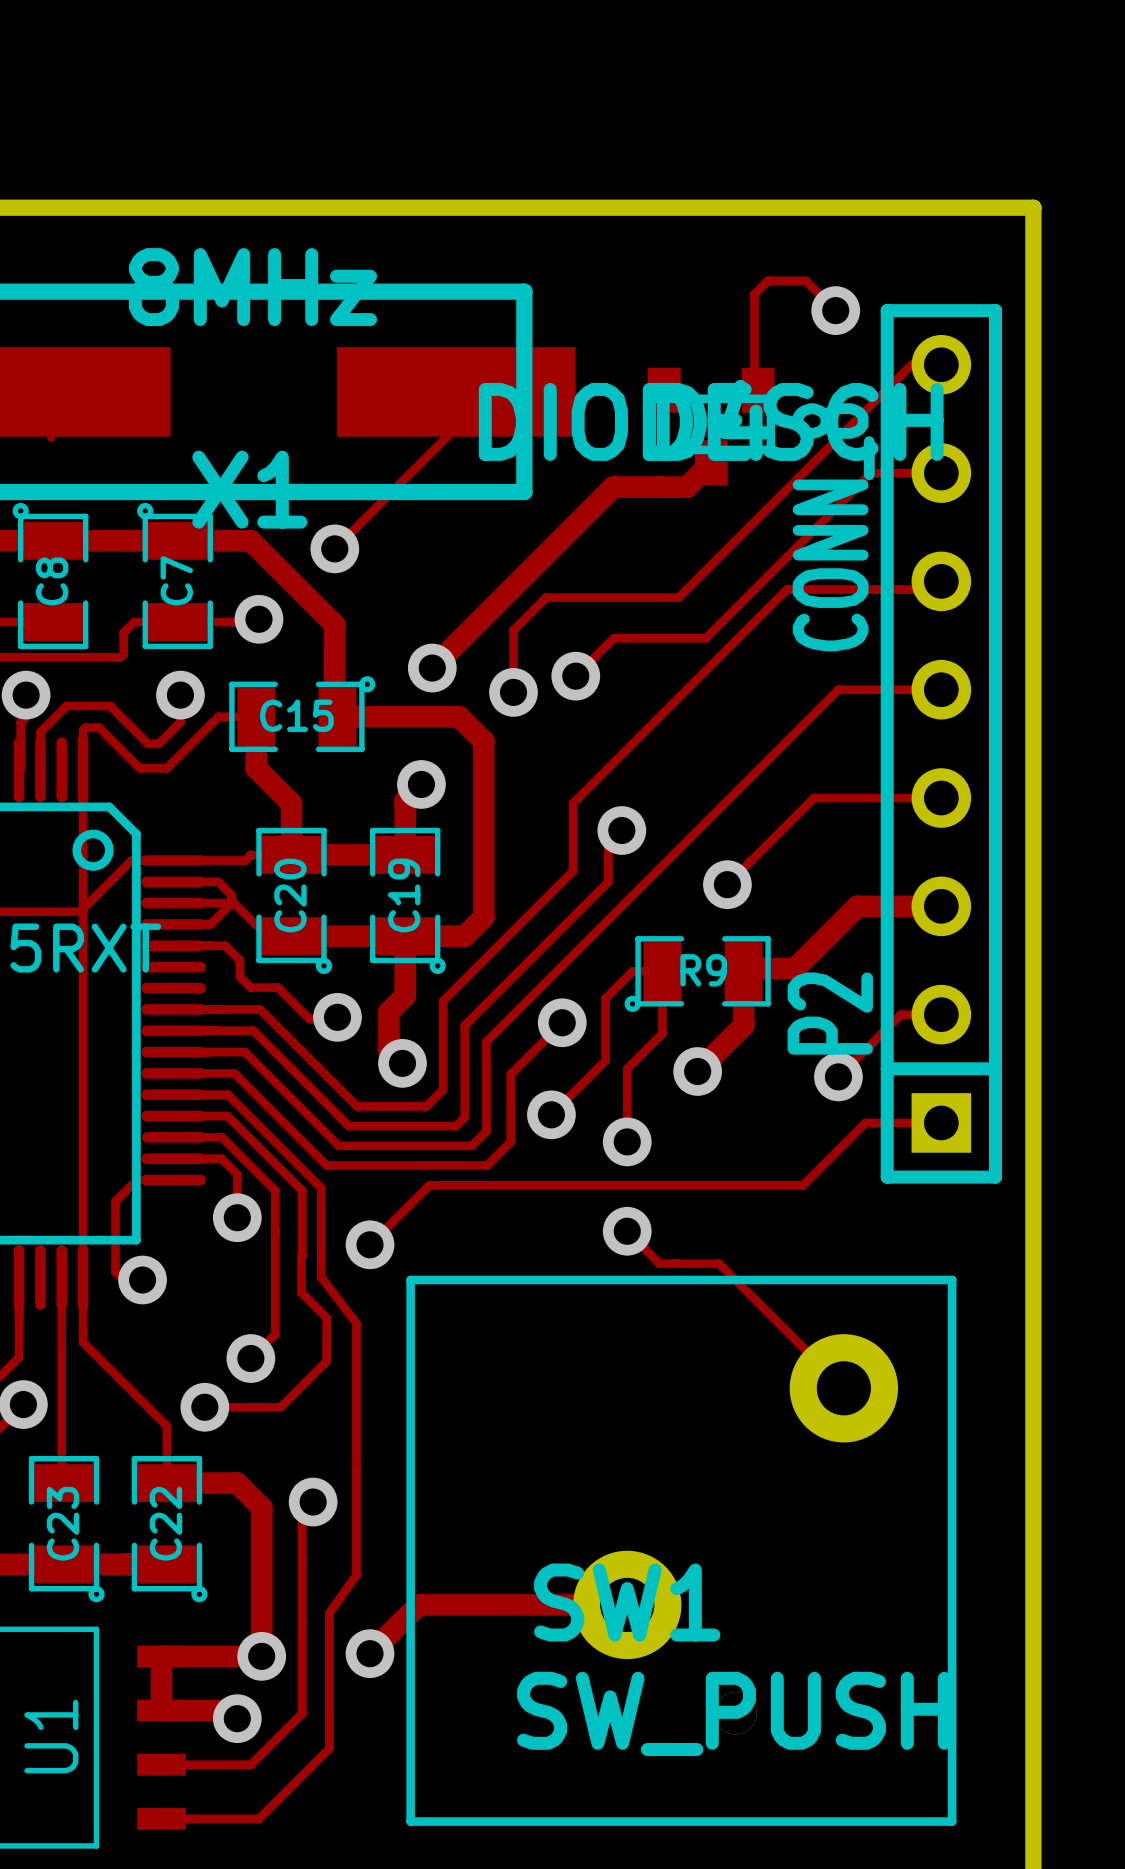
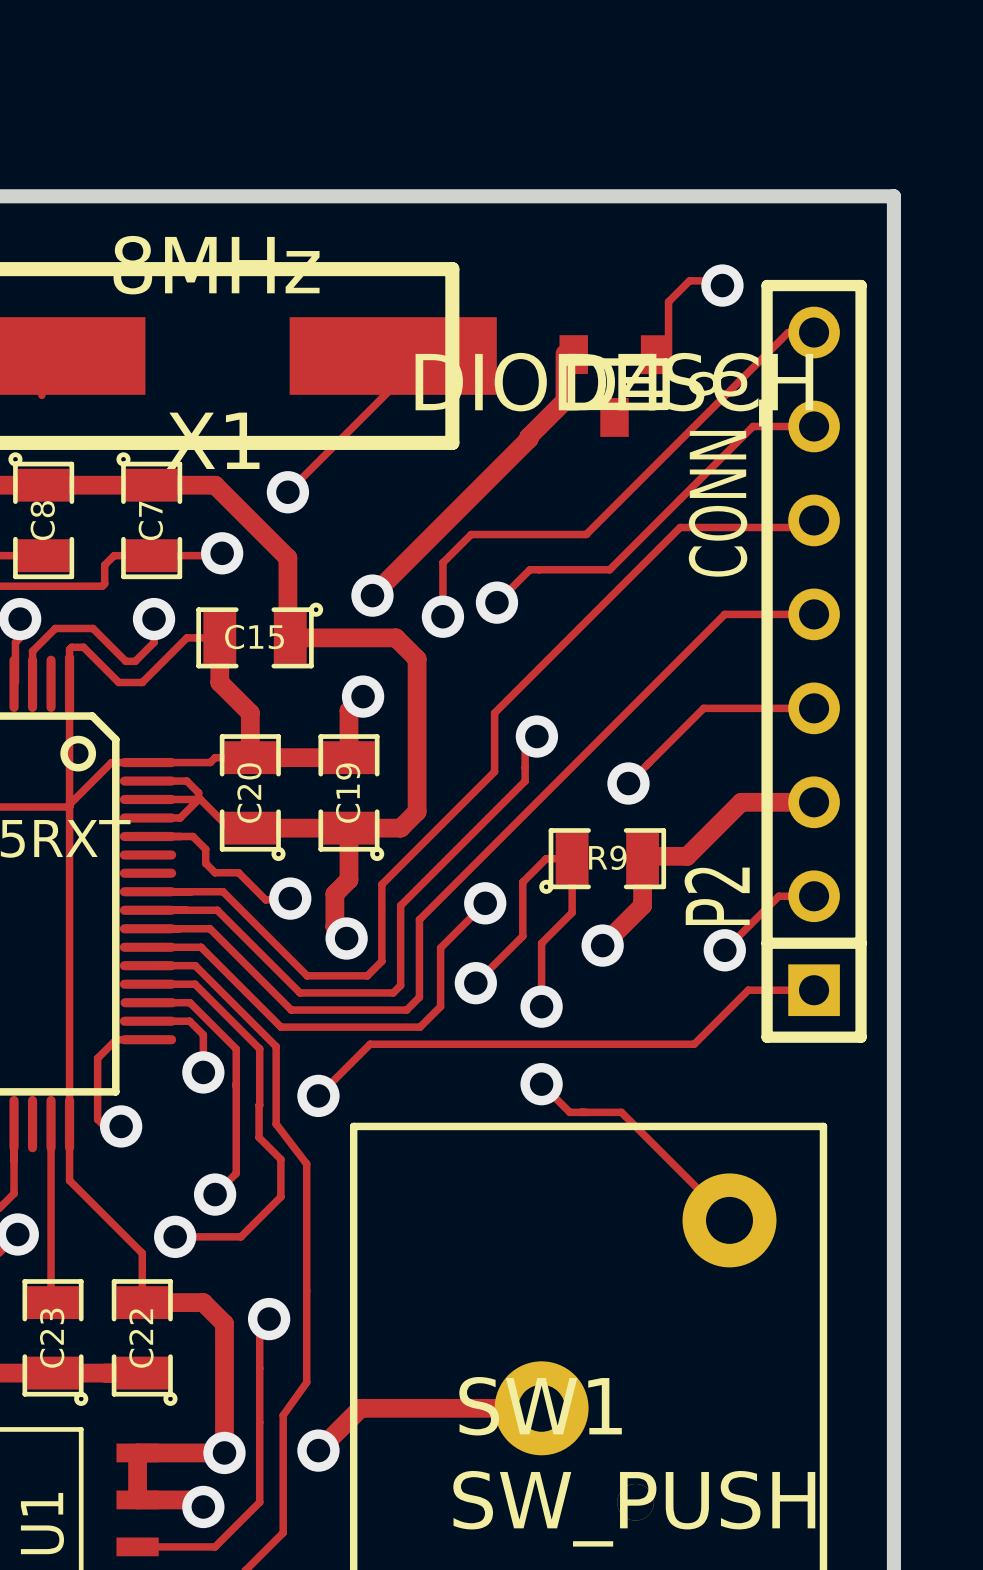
track: (830, 305) (805, 280) (768, 280) (754, 294) (754, 386) (758, 390) -> (717, 280) (689, 280) (668, 301) (668, 353)
track: (711, 462) (686, 487) (613, 487) -> (564, 353) (564, 400) (528, 437) (528, 439)

